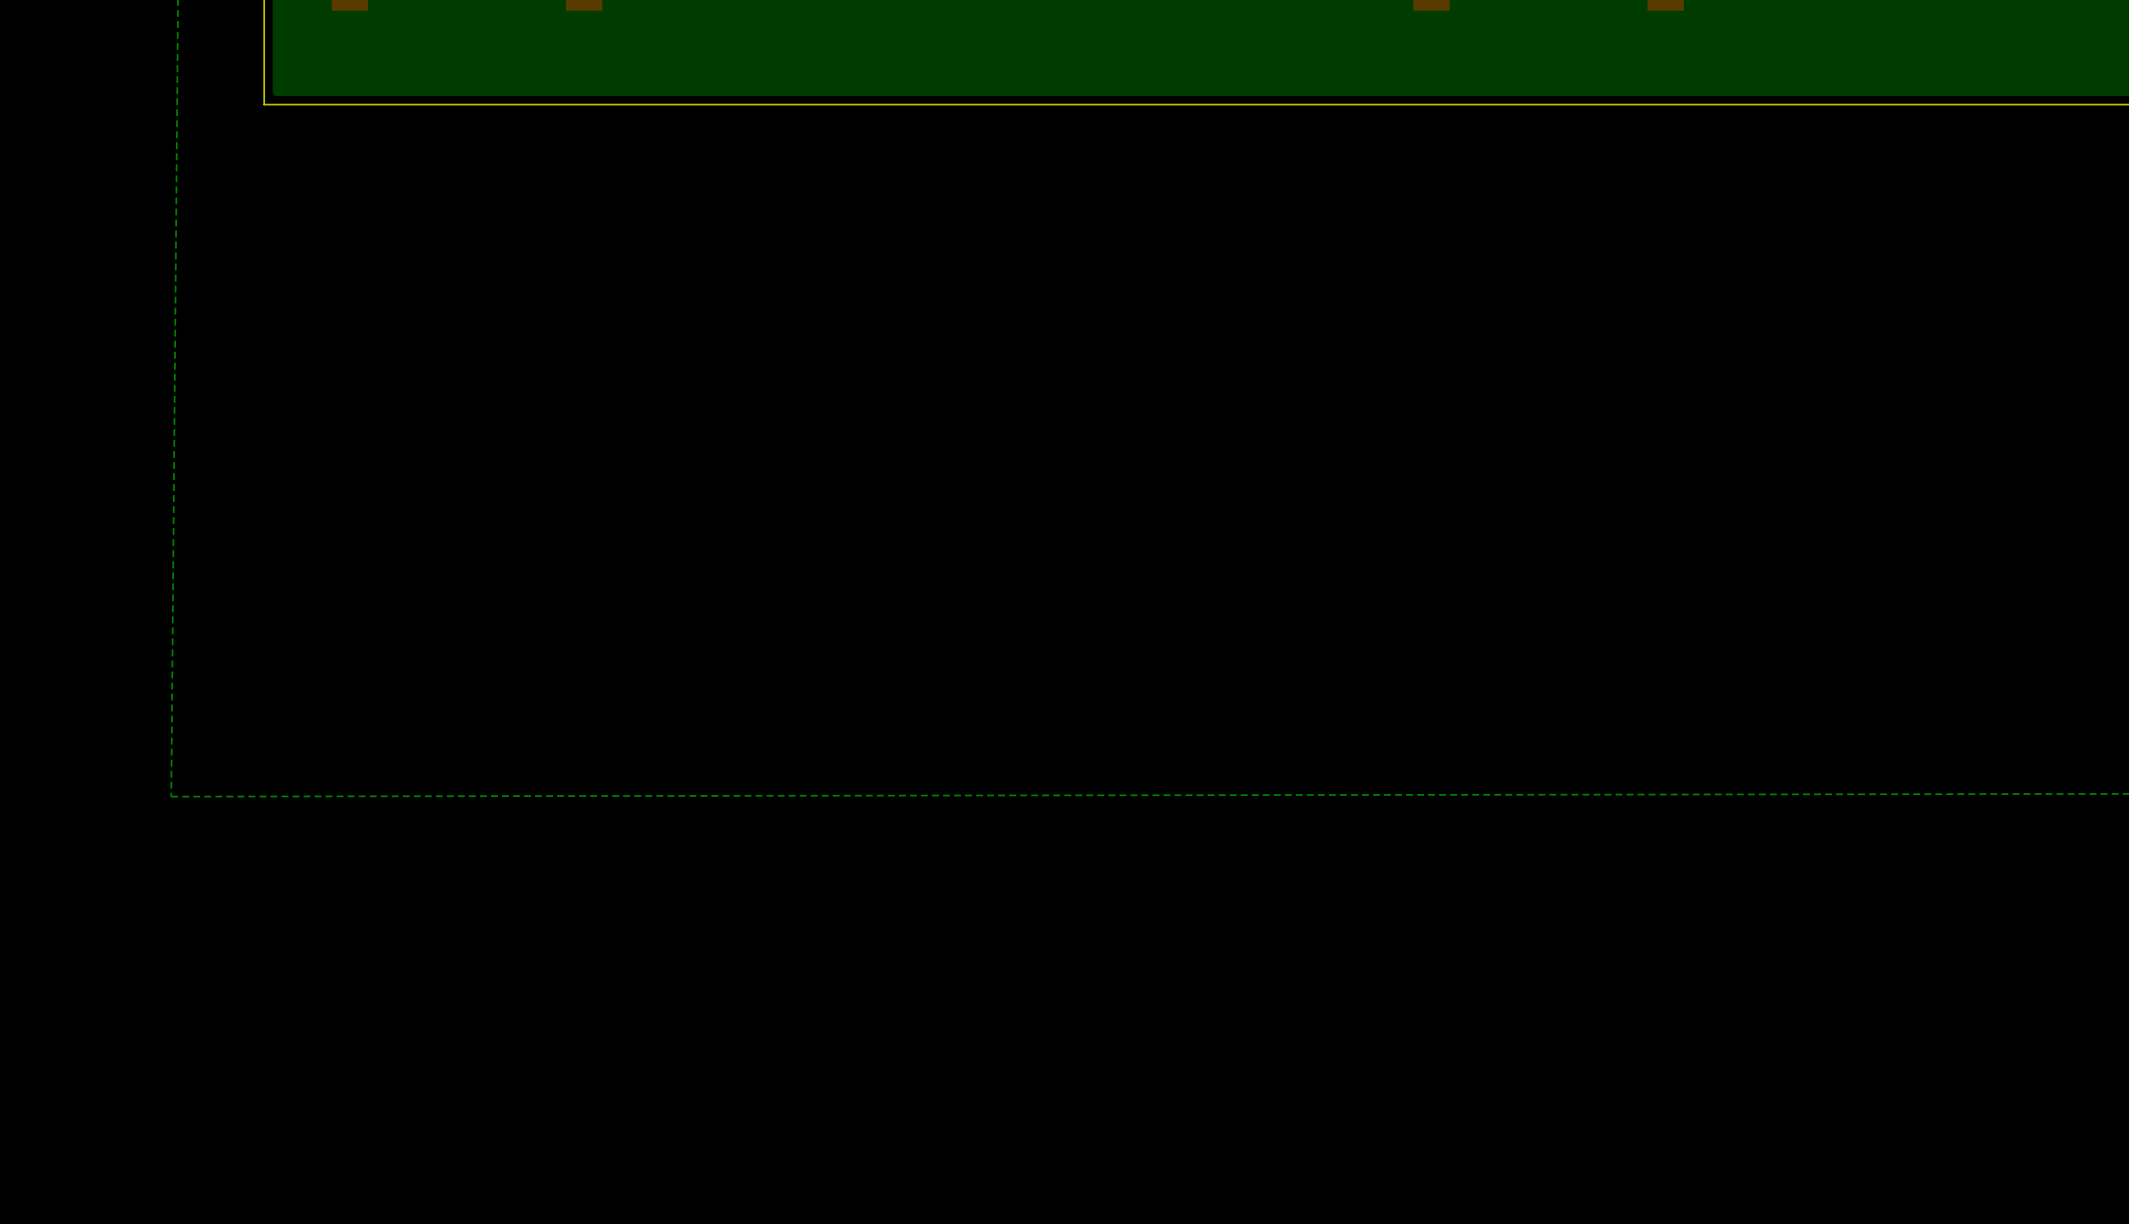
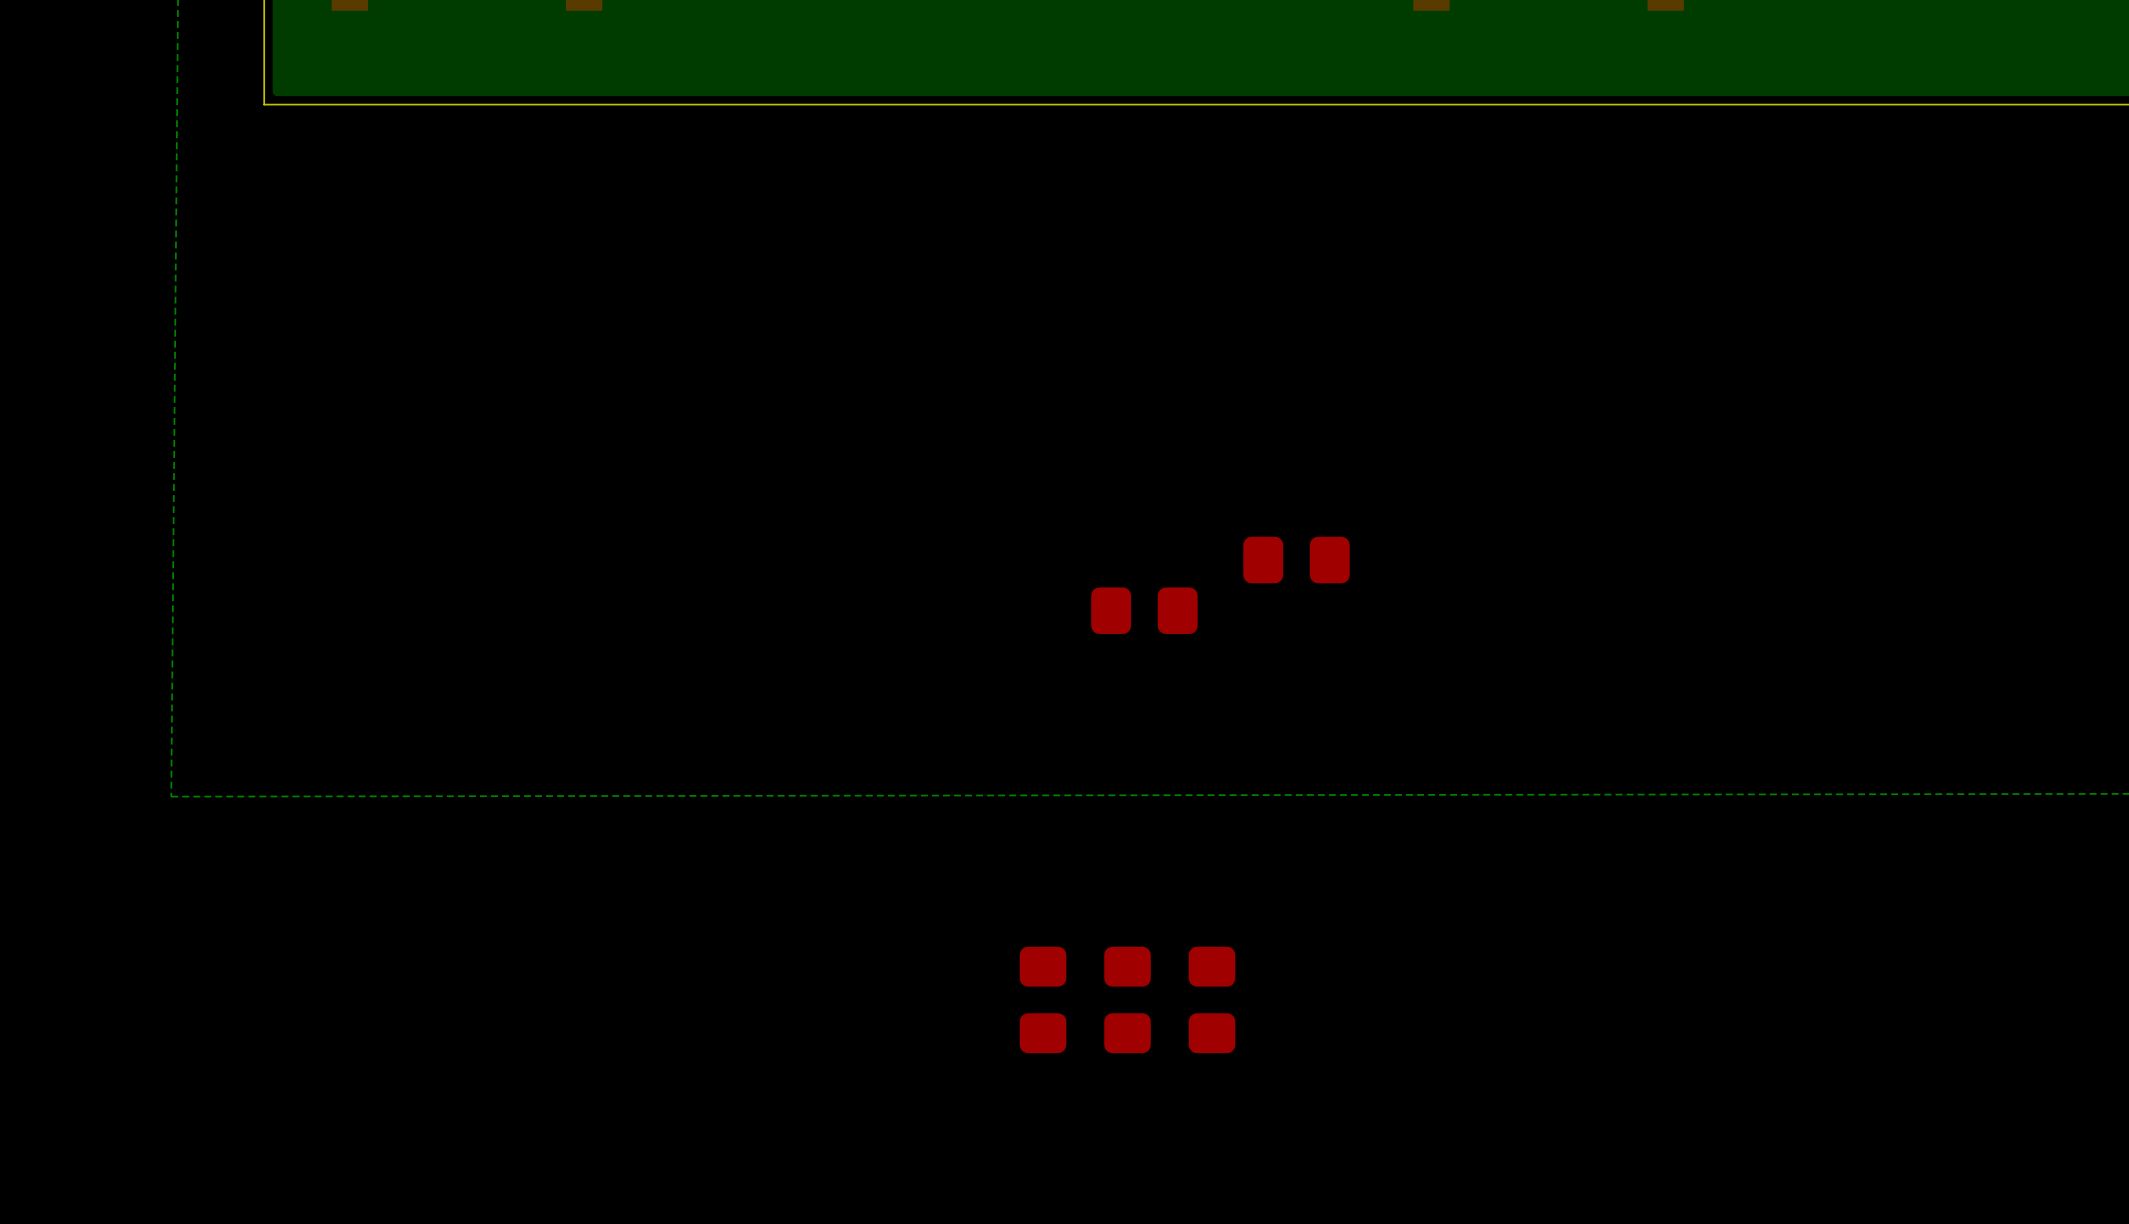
part: none -> (1296, 560)
part: none -> (1144, 610)
part: none -> (1043, 999)
part: none -> (1127, 999)
part: none -> (1212, 999)

